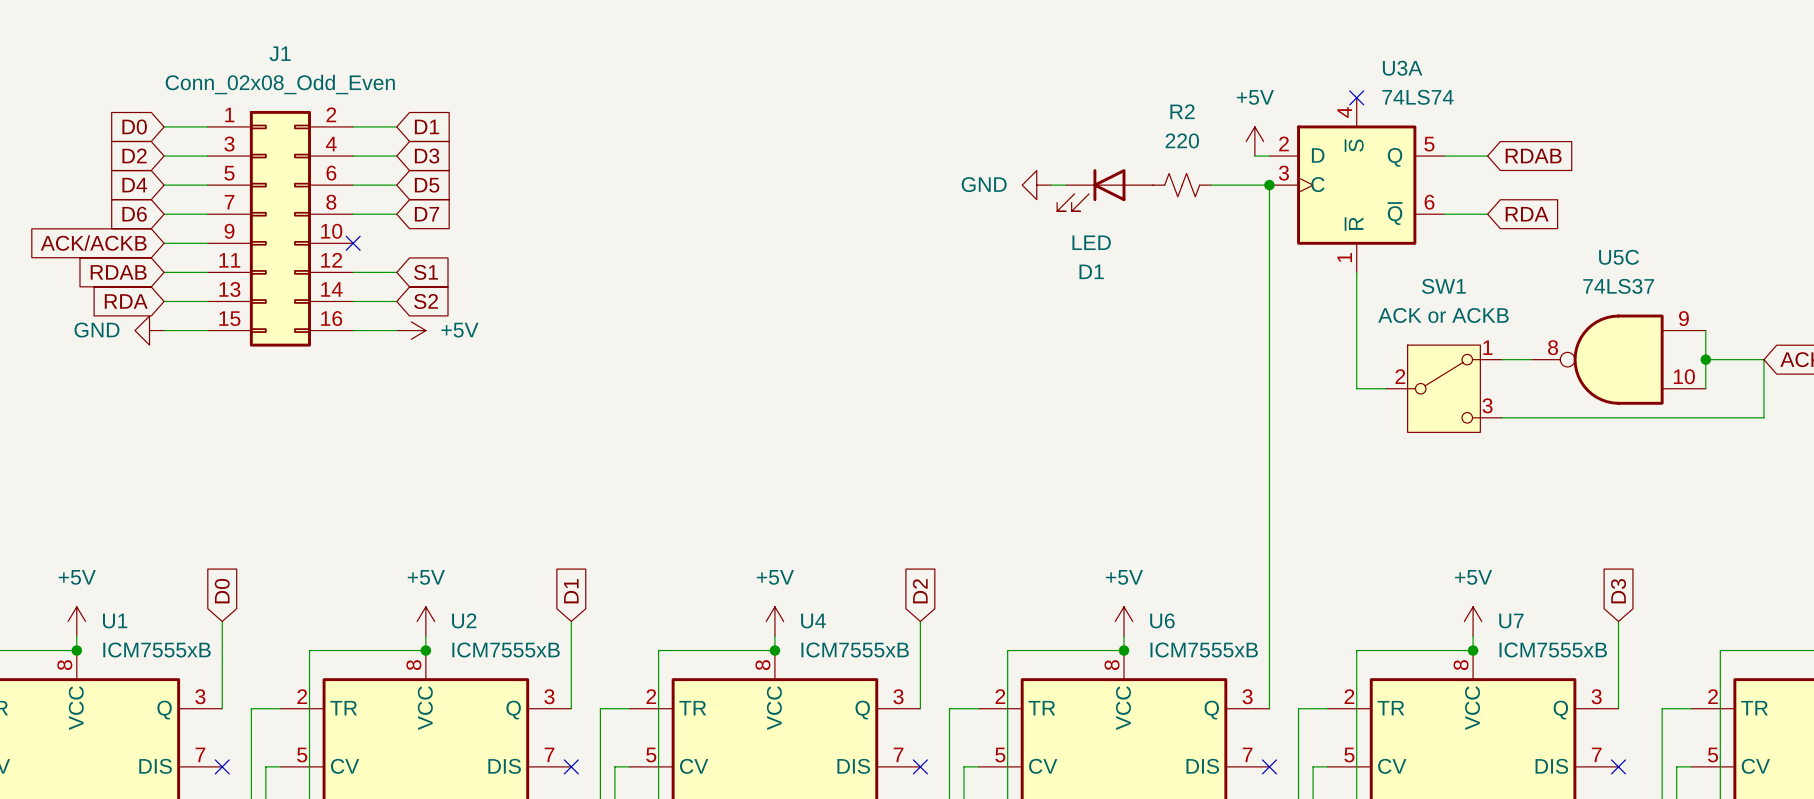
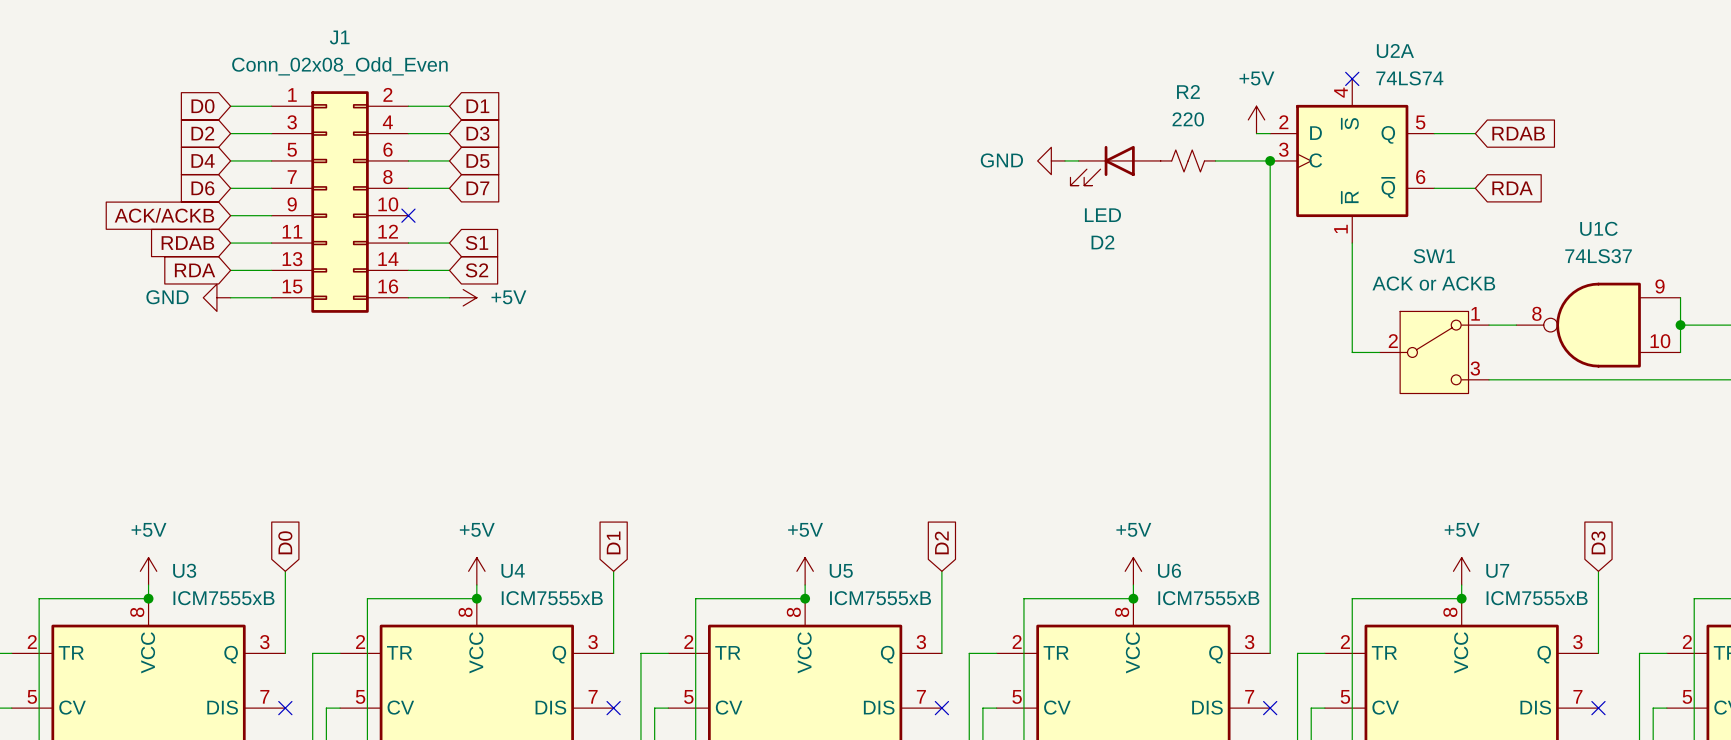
U3A name: U3A (1402, 68) -> U2A (1395, 51)
U5C name: U5C (1619, 257) -> U1C (1598, 228)
D1 name: D1 (1091, 271) -> D2 (1102, 242)
U2 name: U2 (464, 620) -> U4 (513, 570)
U1 name: U1 (115, 621) -> U3 (184, 570)
U4 name: U4 (813, 621) -> U5 (841, 570)

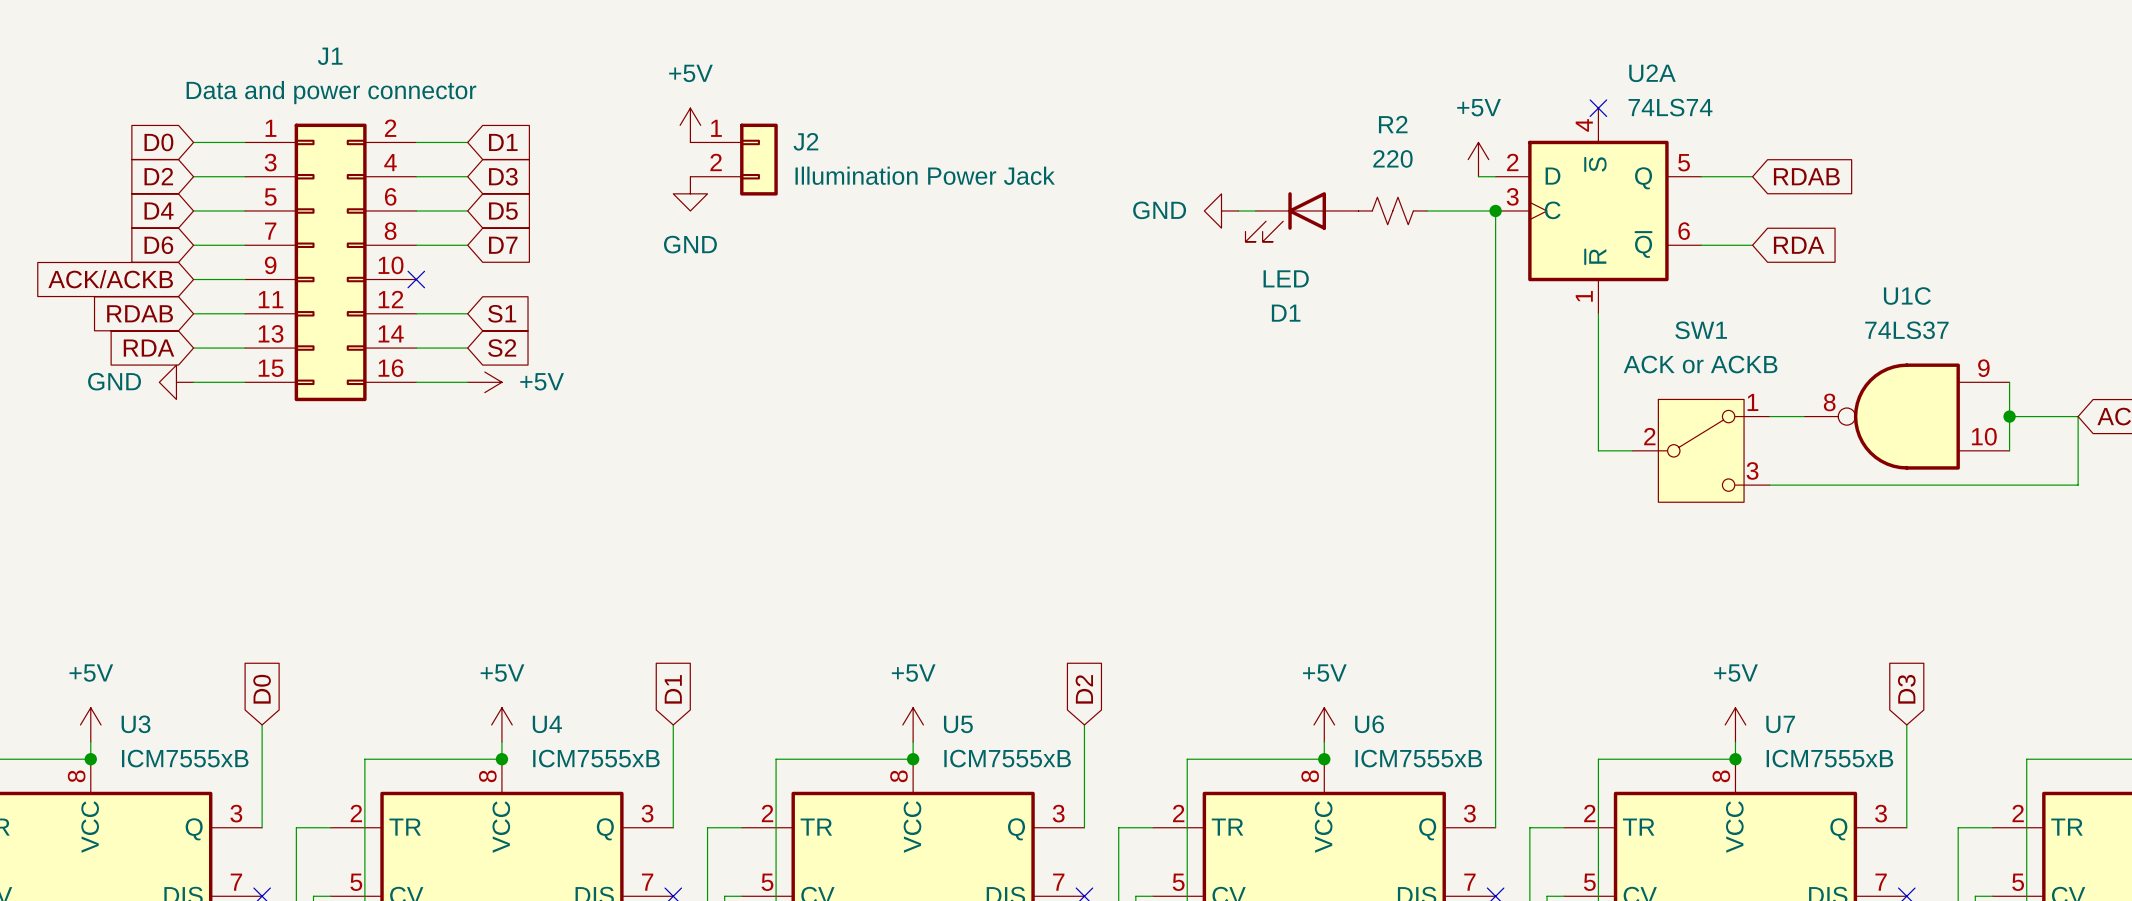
J1 value: Conn_02x08_Odd_Even (339, 66) -> Data and power connector (331, 92)
power symbol: none -> +5V (690, 125)
J2: none -> Illumination Power Jack (734, 159)
power symbol: none -> GND (690, 193)
D2 name: D2 (1102, 242) -> D1 (1286, 313)

